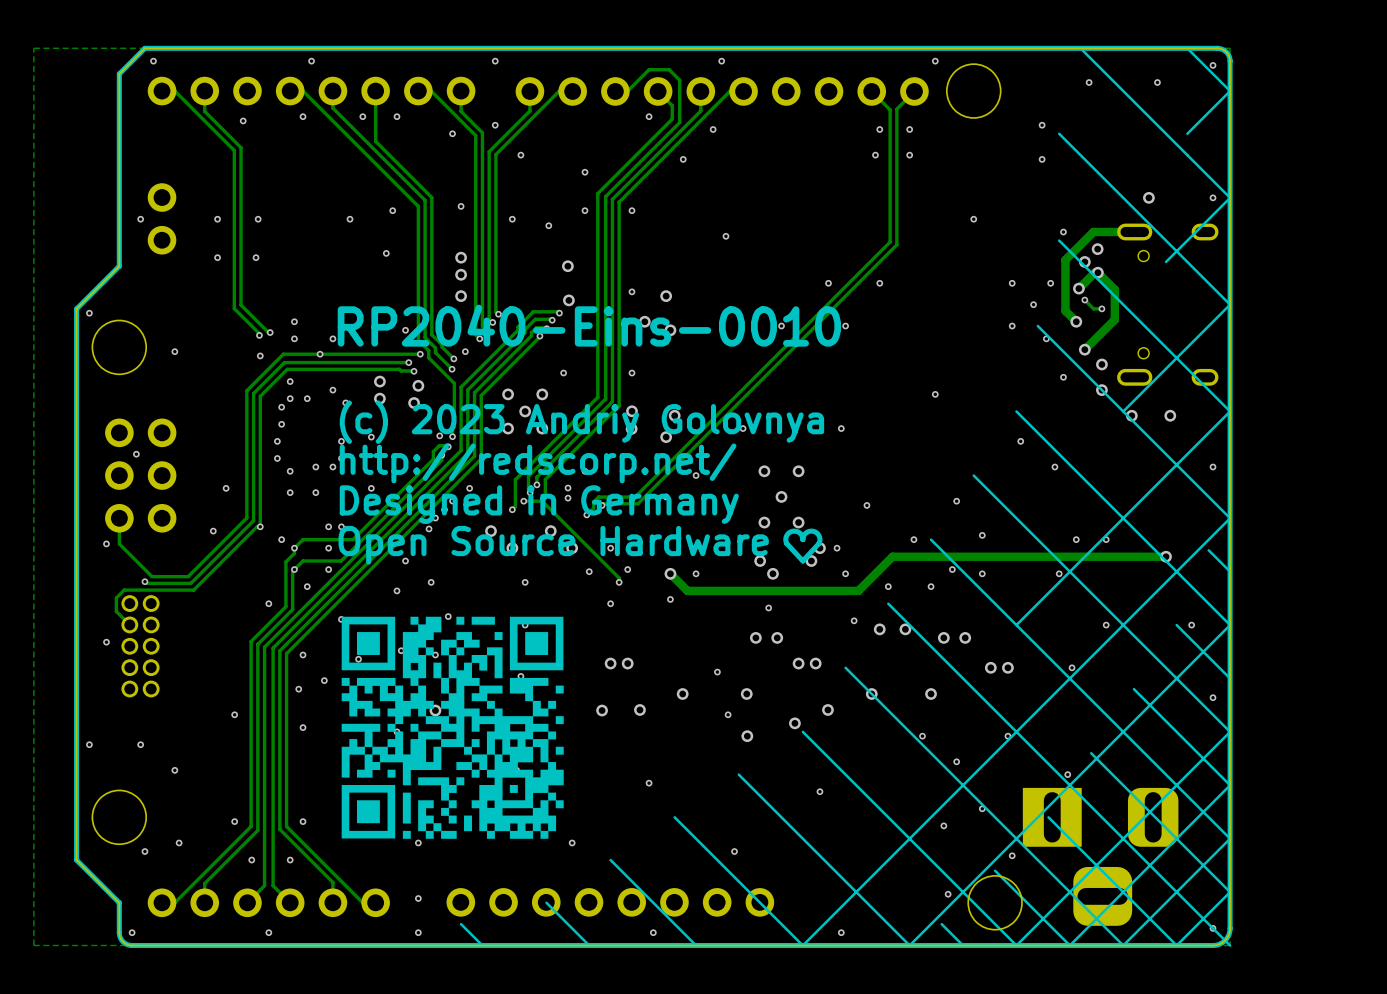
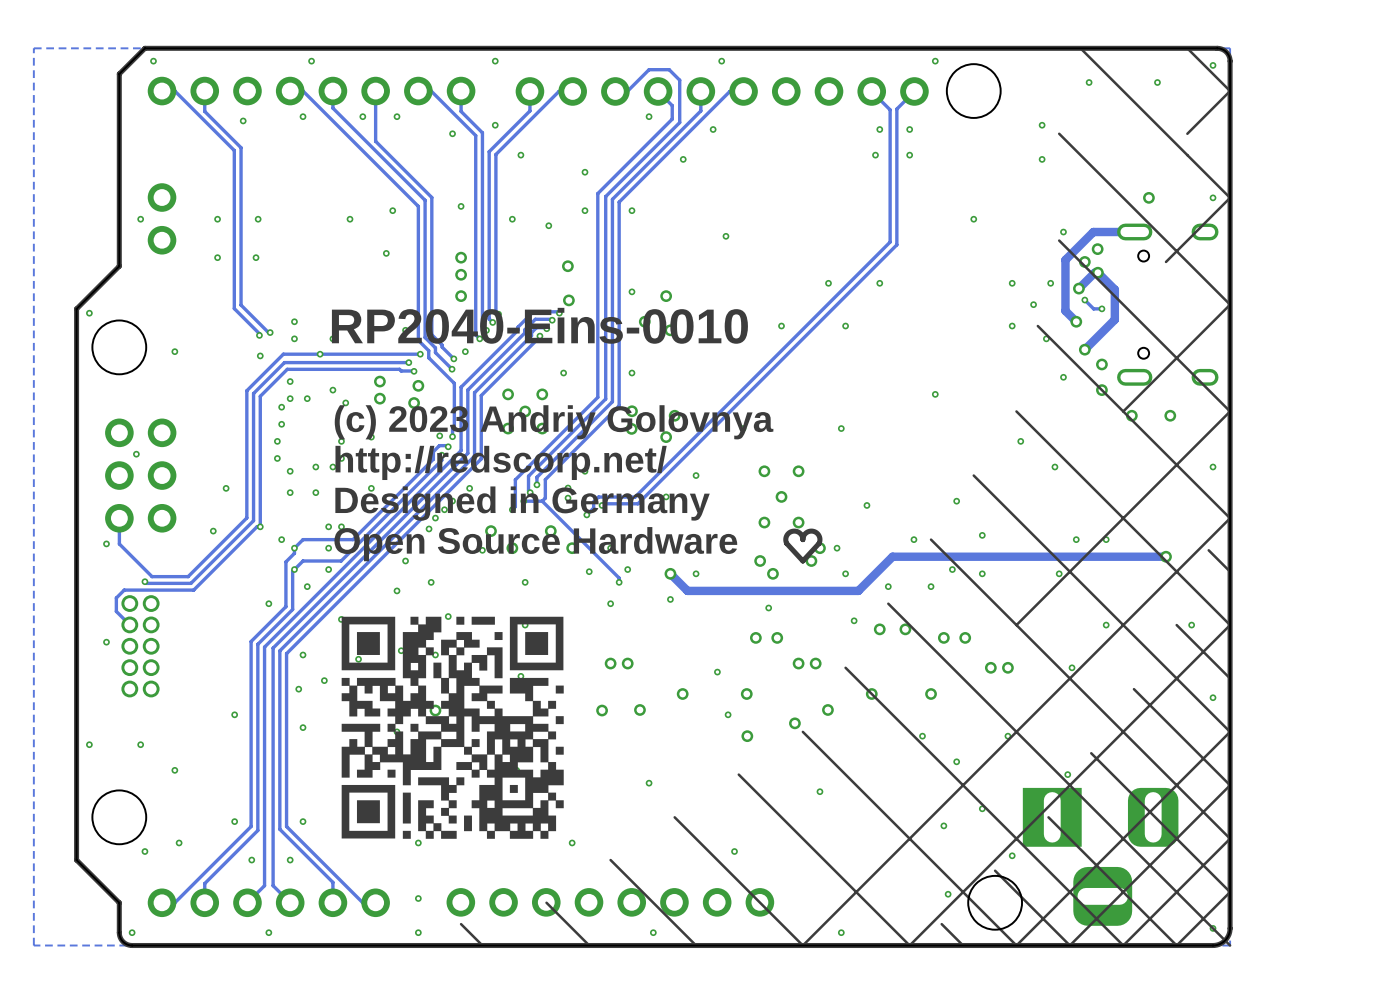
via: none -> (482, 550)

